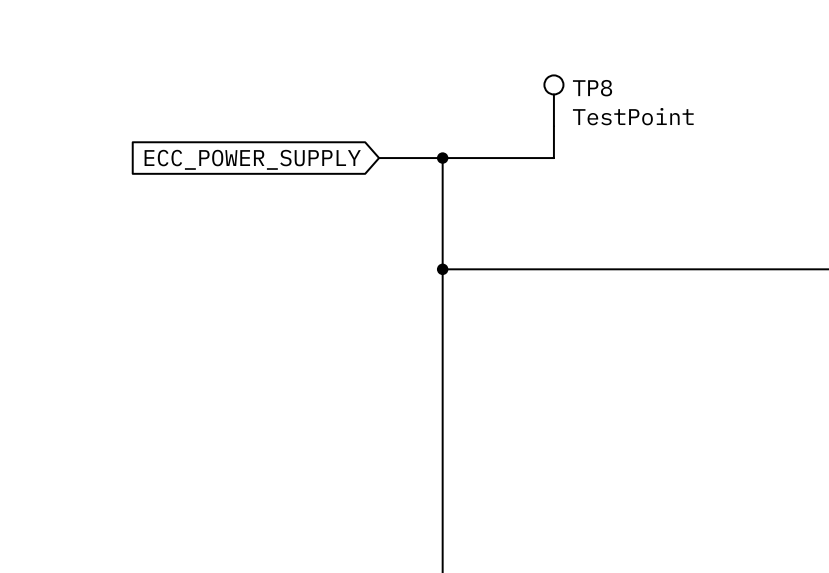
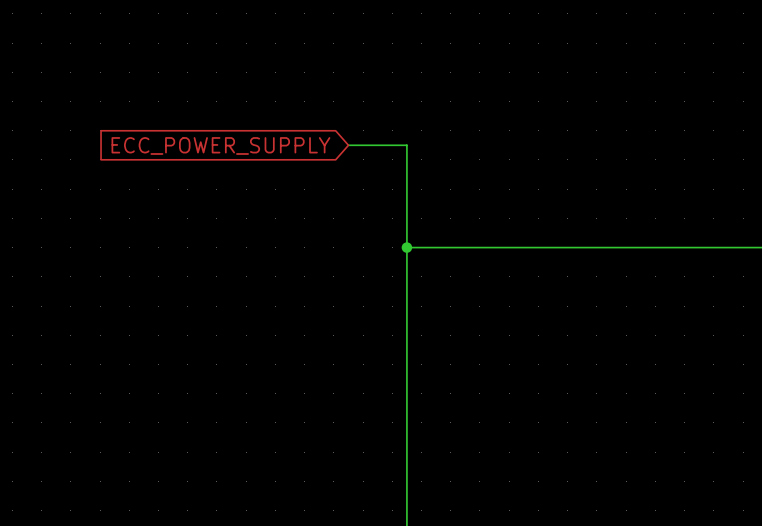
TP8: TestPoint (553, 100) -> none
wire: (553, 126) (553, 158) (442, 158) -> none
junction: (442, 158) -> none

